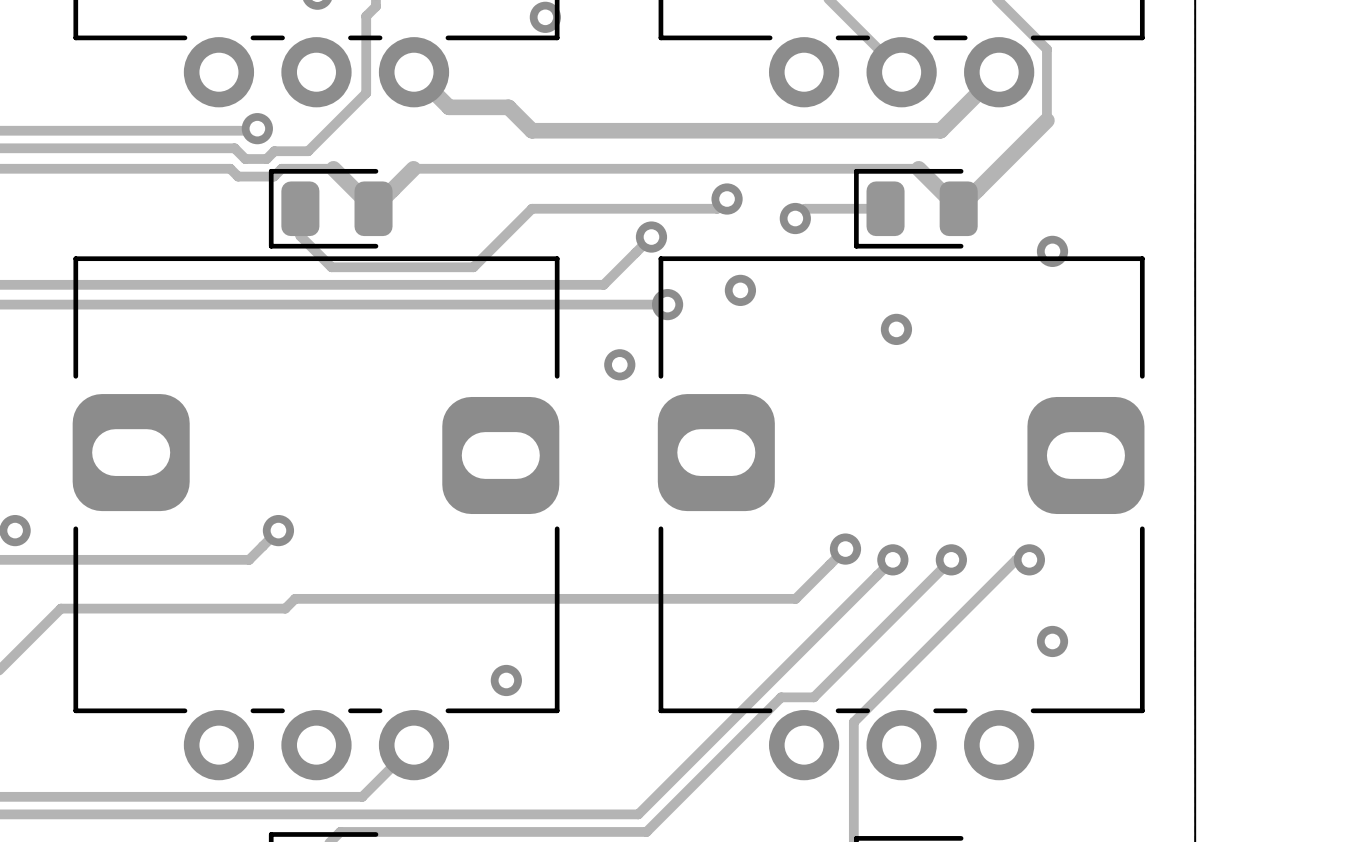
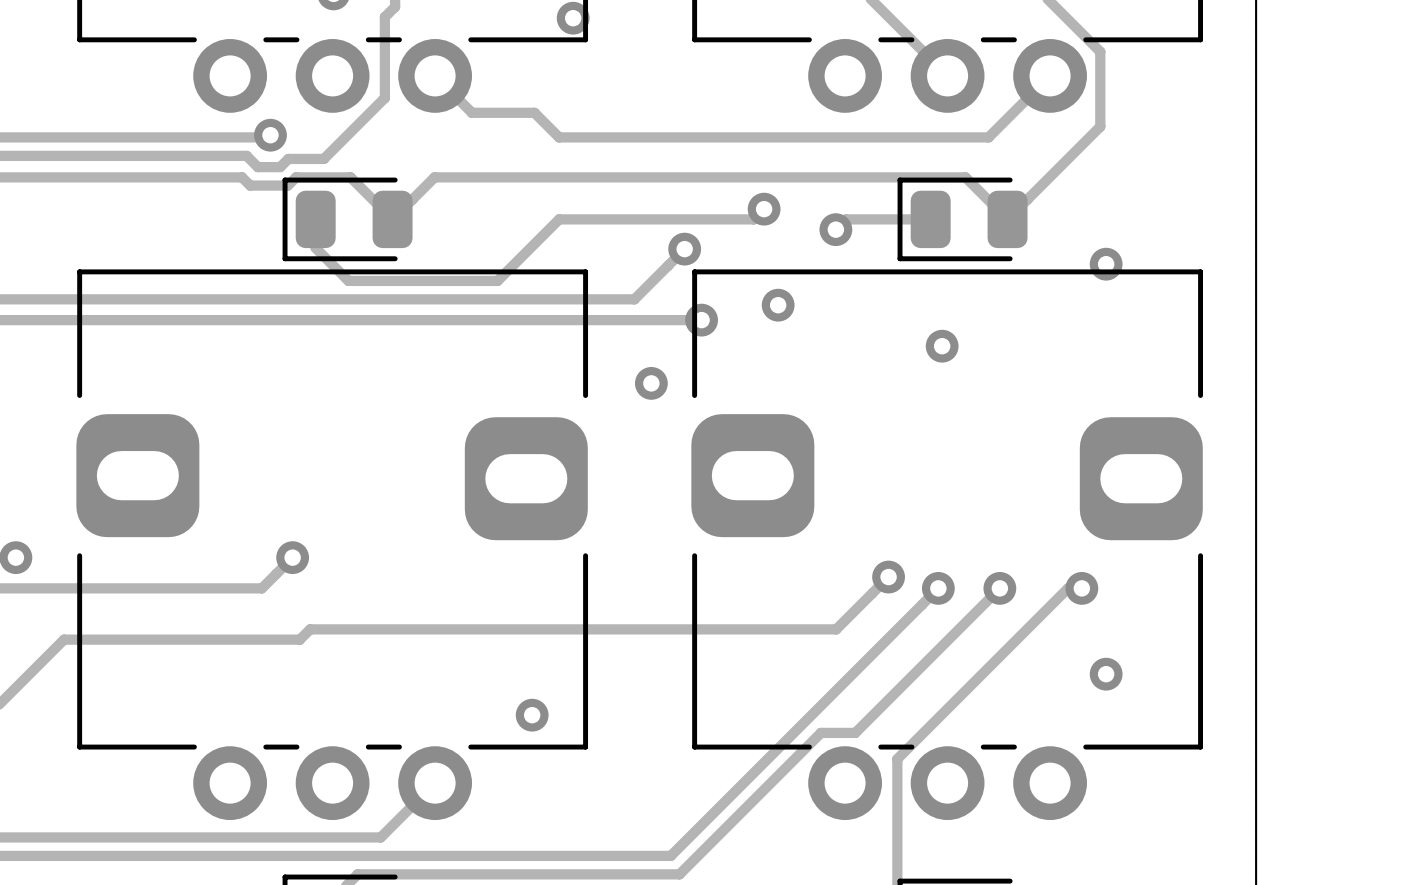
track width: thick (414, 72) (449, 107) (508, 107) (532, 130) (940, 130) (999, 72) -> thin (435, 75) (472, 112) (534, 112) (559, 137) (988, 137) (1050, 75)
track width: thick (1046, 120) (958, 208) (918, 168) -> thin (1100, 126) (1007, 219) (965, 177)
track width: thick (333, 168) (373, 208) (413, 168) -> thin (350, 177) (392, 219) (434, 177)

